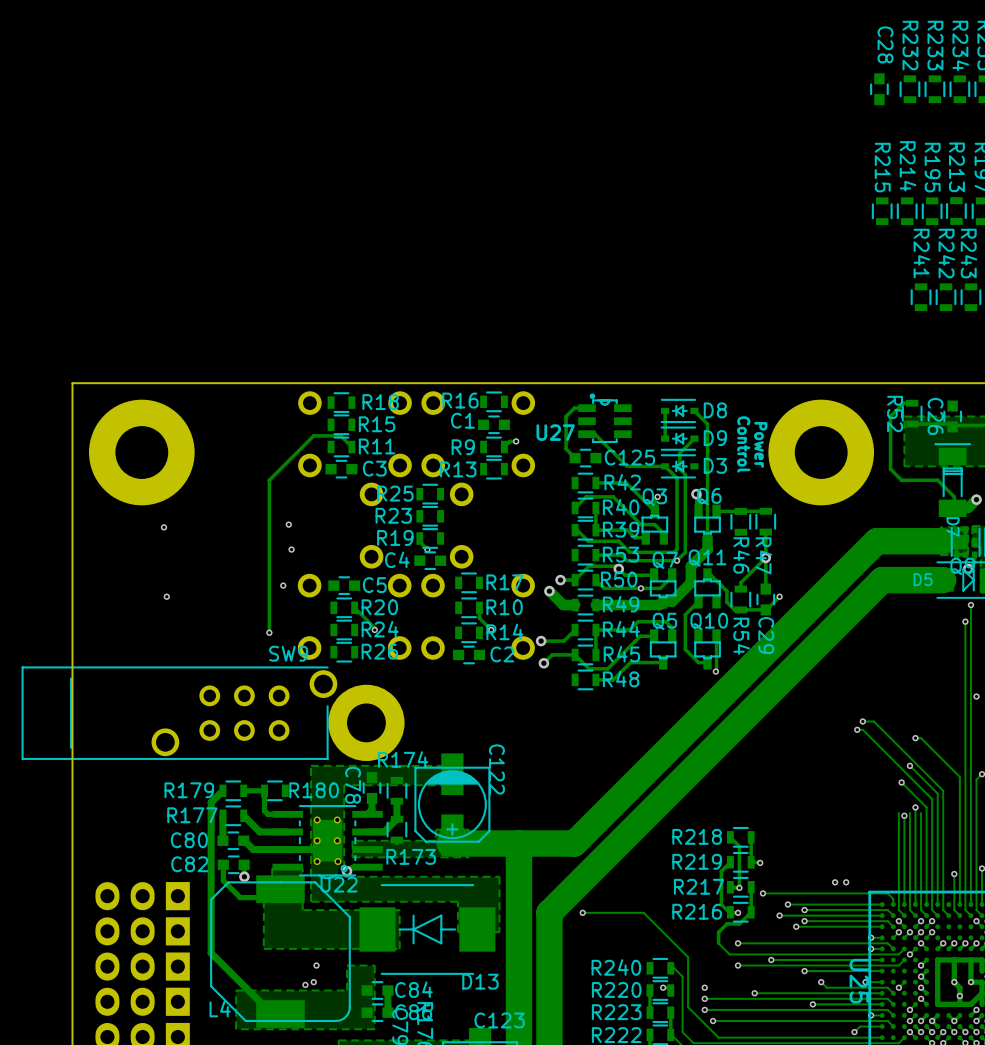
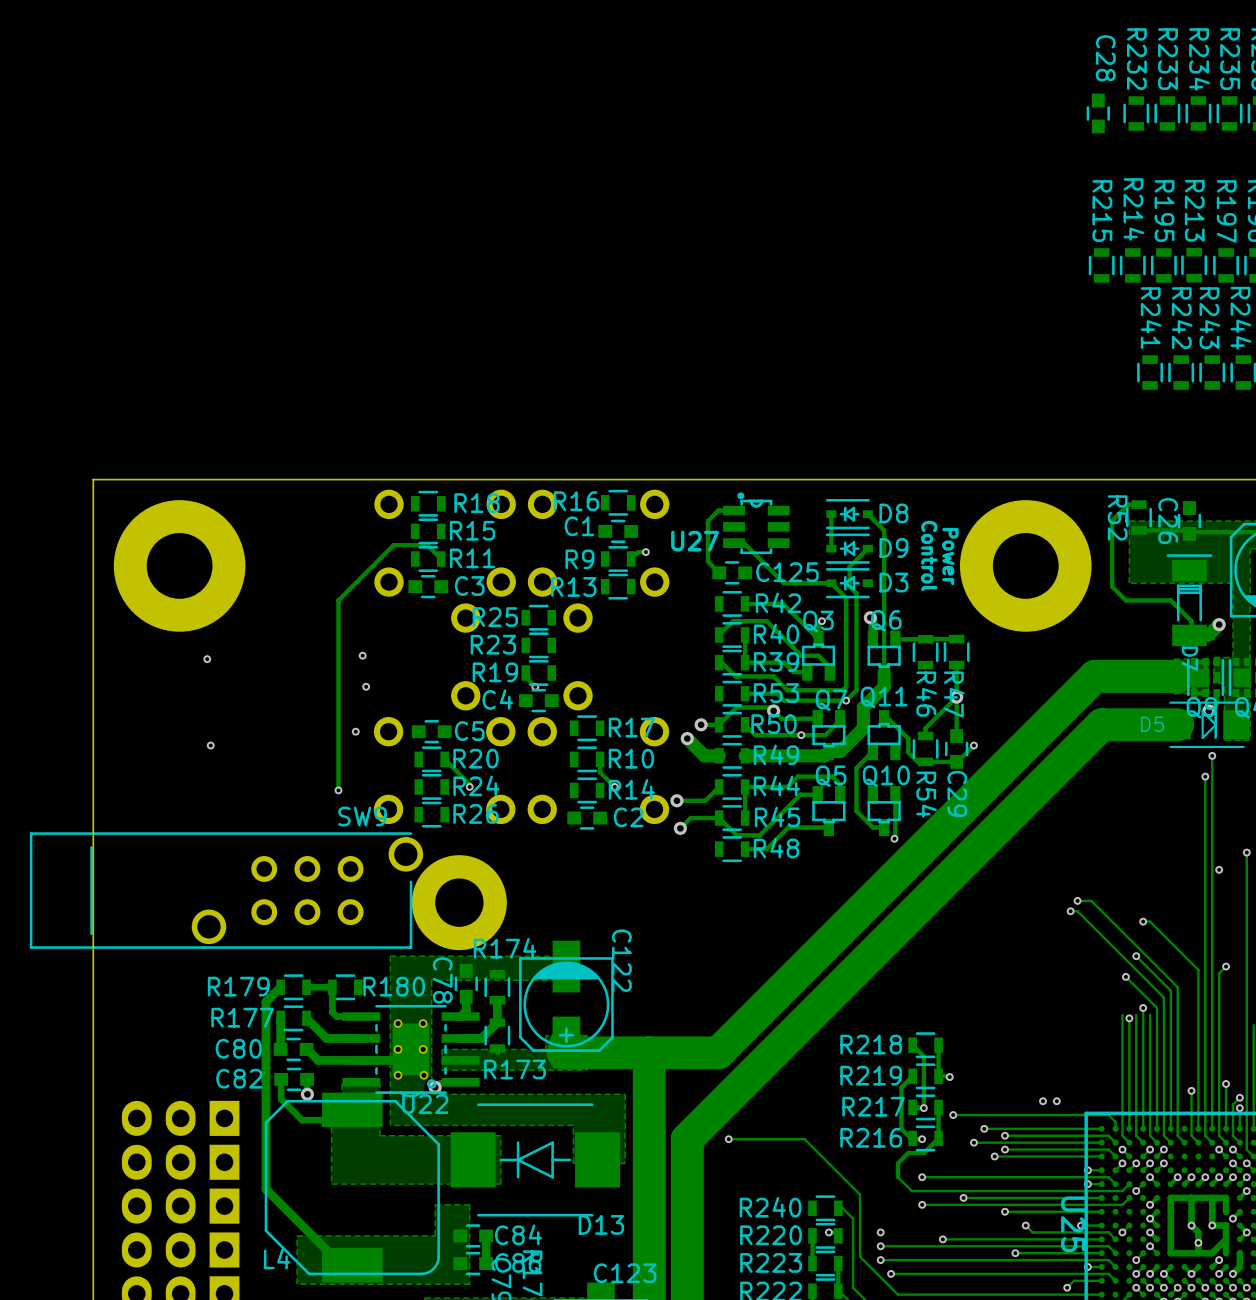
via: (316, 965) -> none
via: (313, 982) -> none
via: (305, 984) -> none

